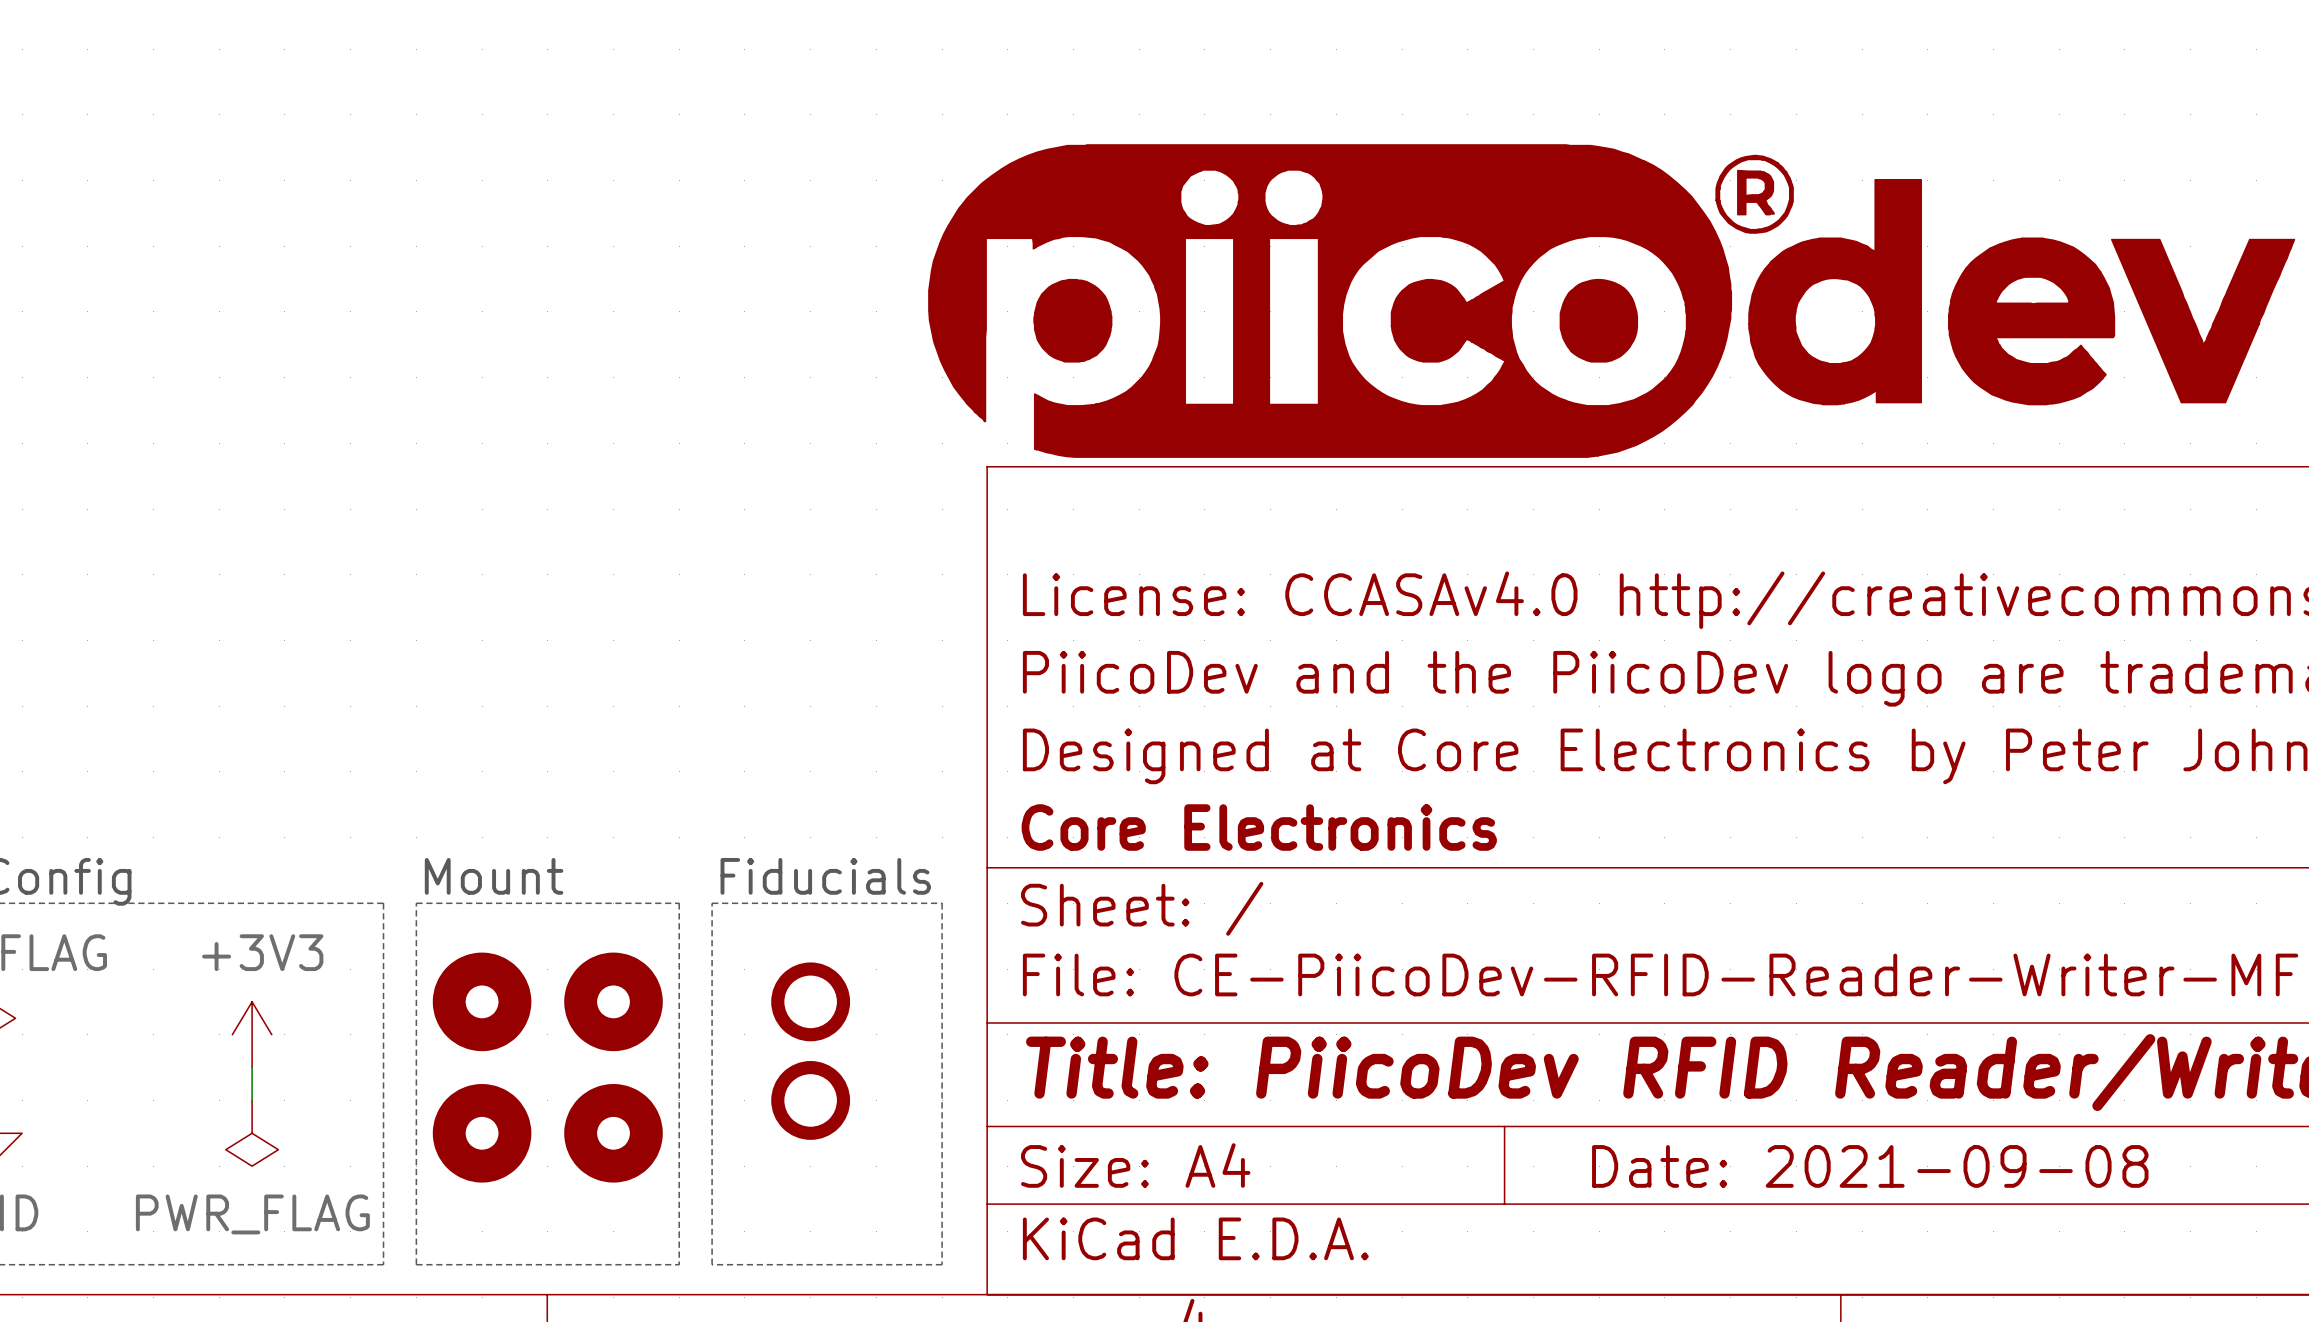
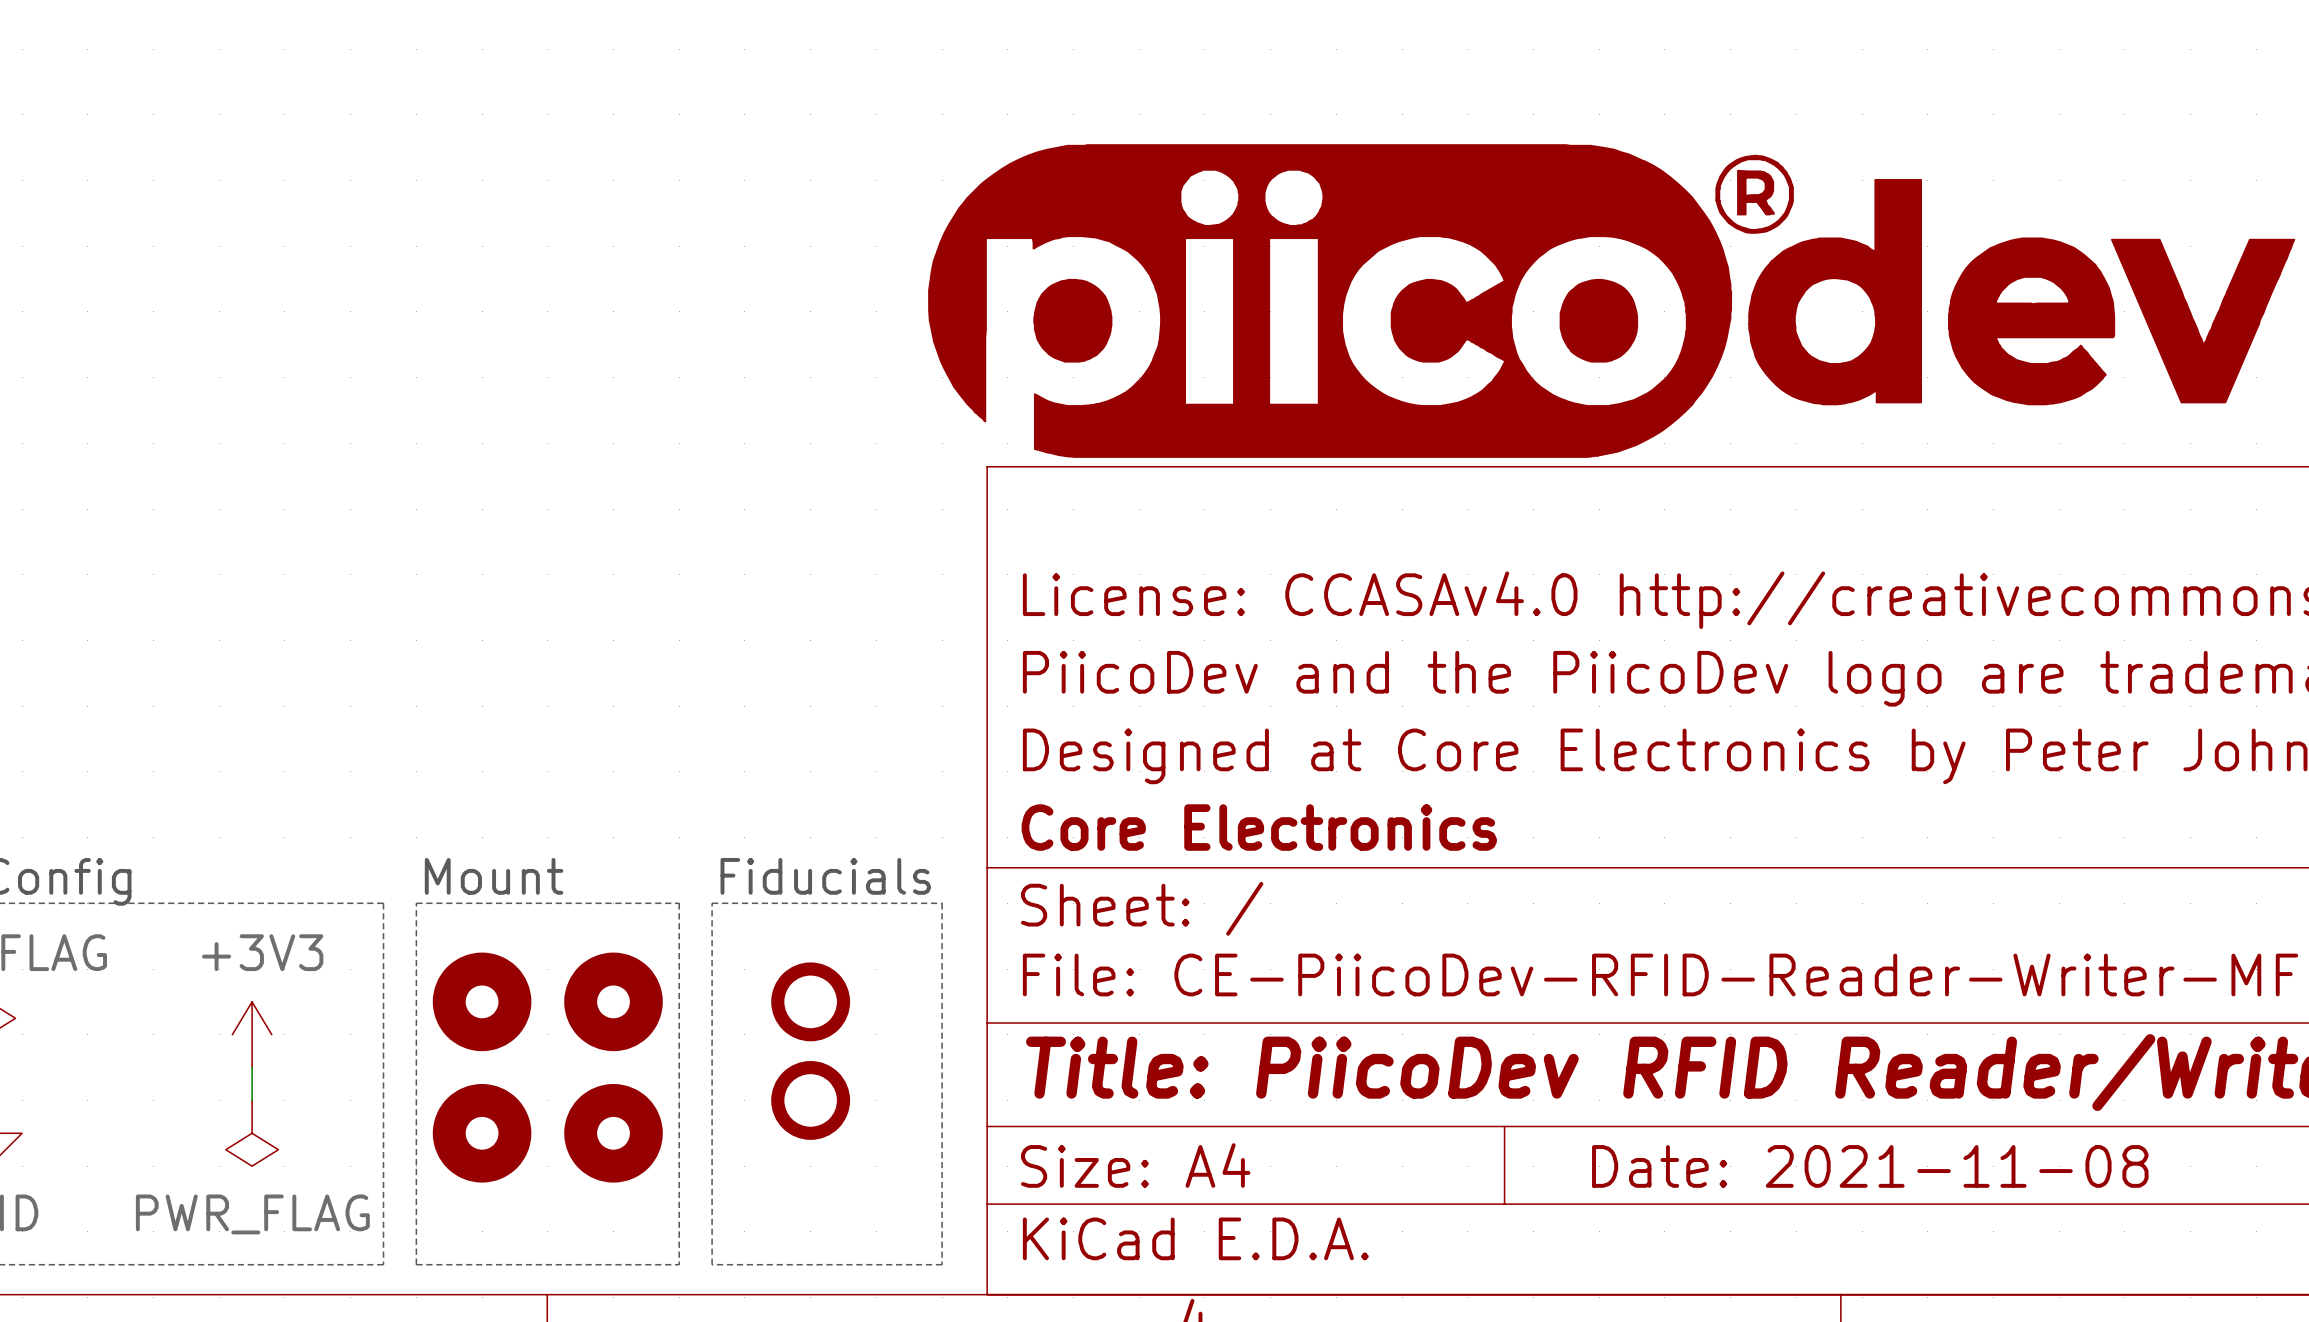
title block: Date: 2021-09-08 (1870, 1166) -> Date: 2021-11-08 (1870, 1166)

